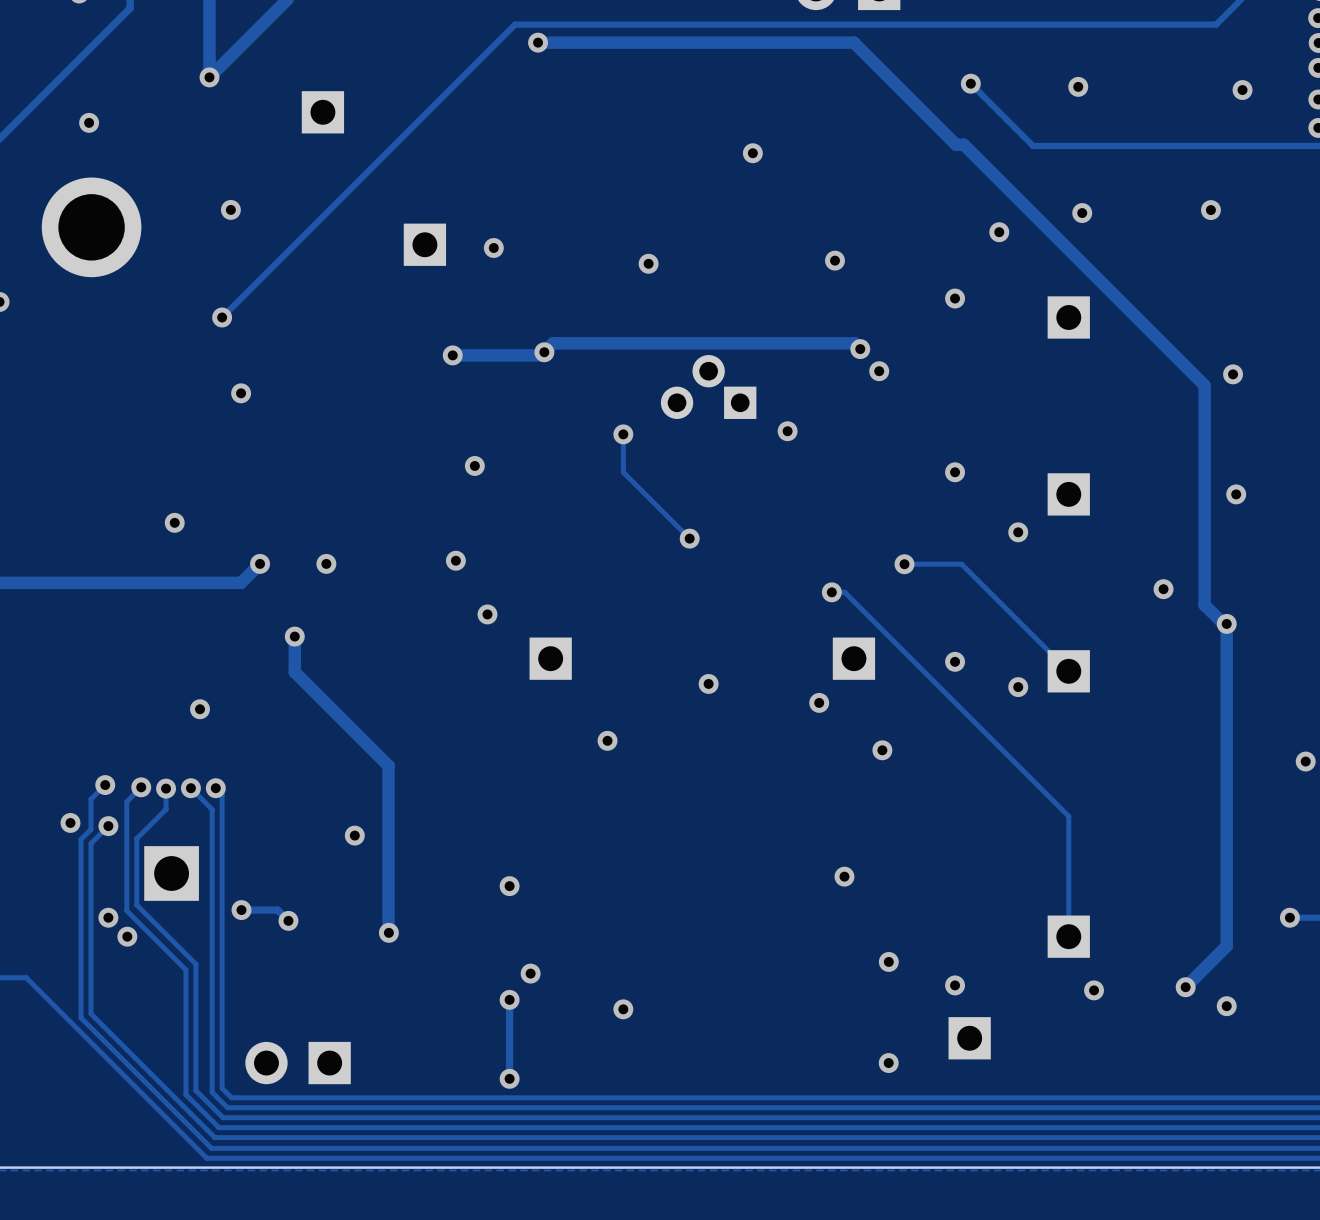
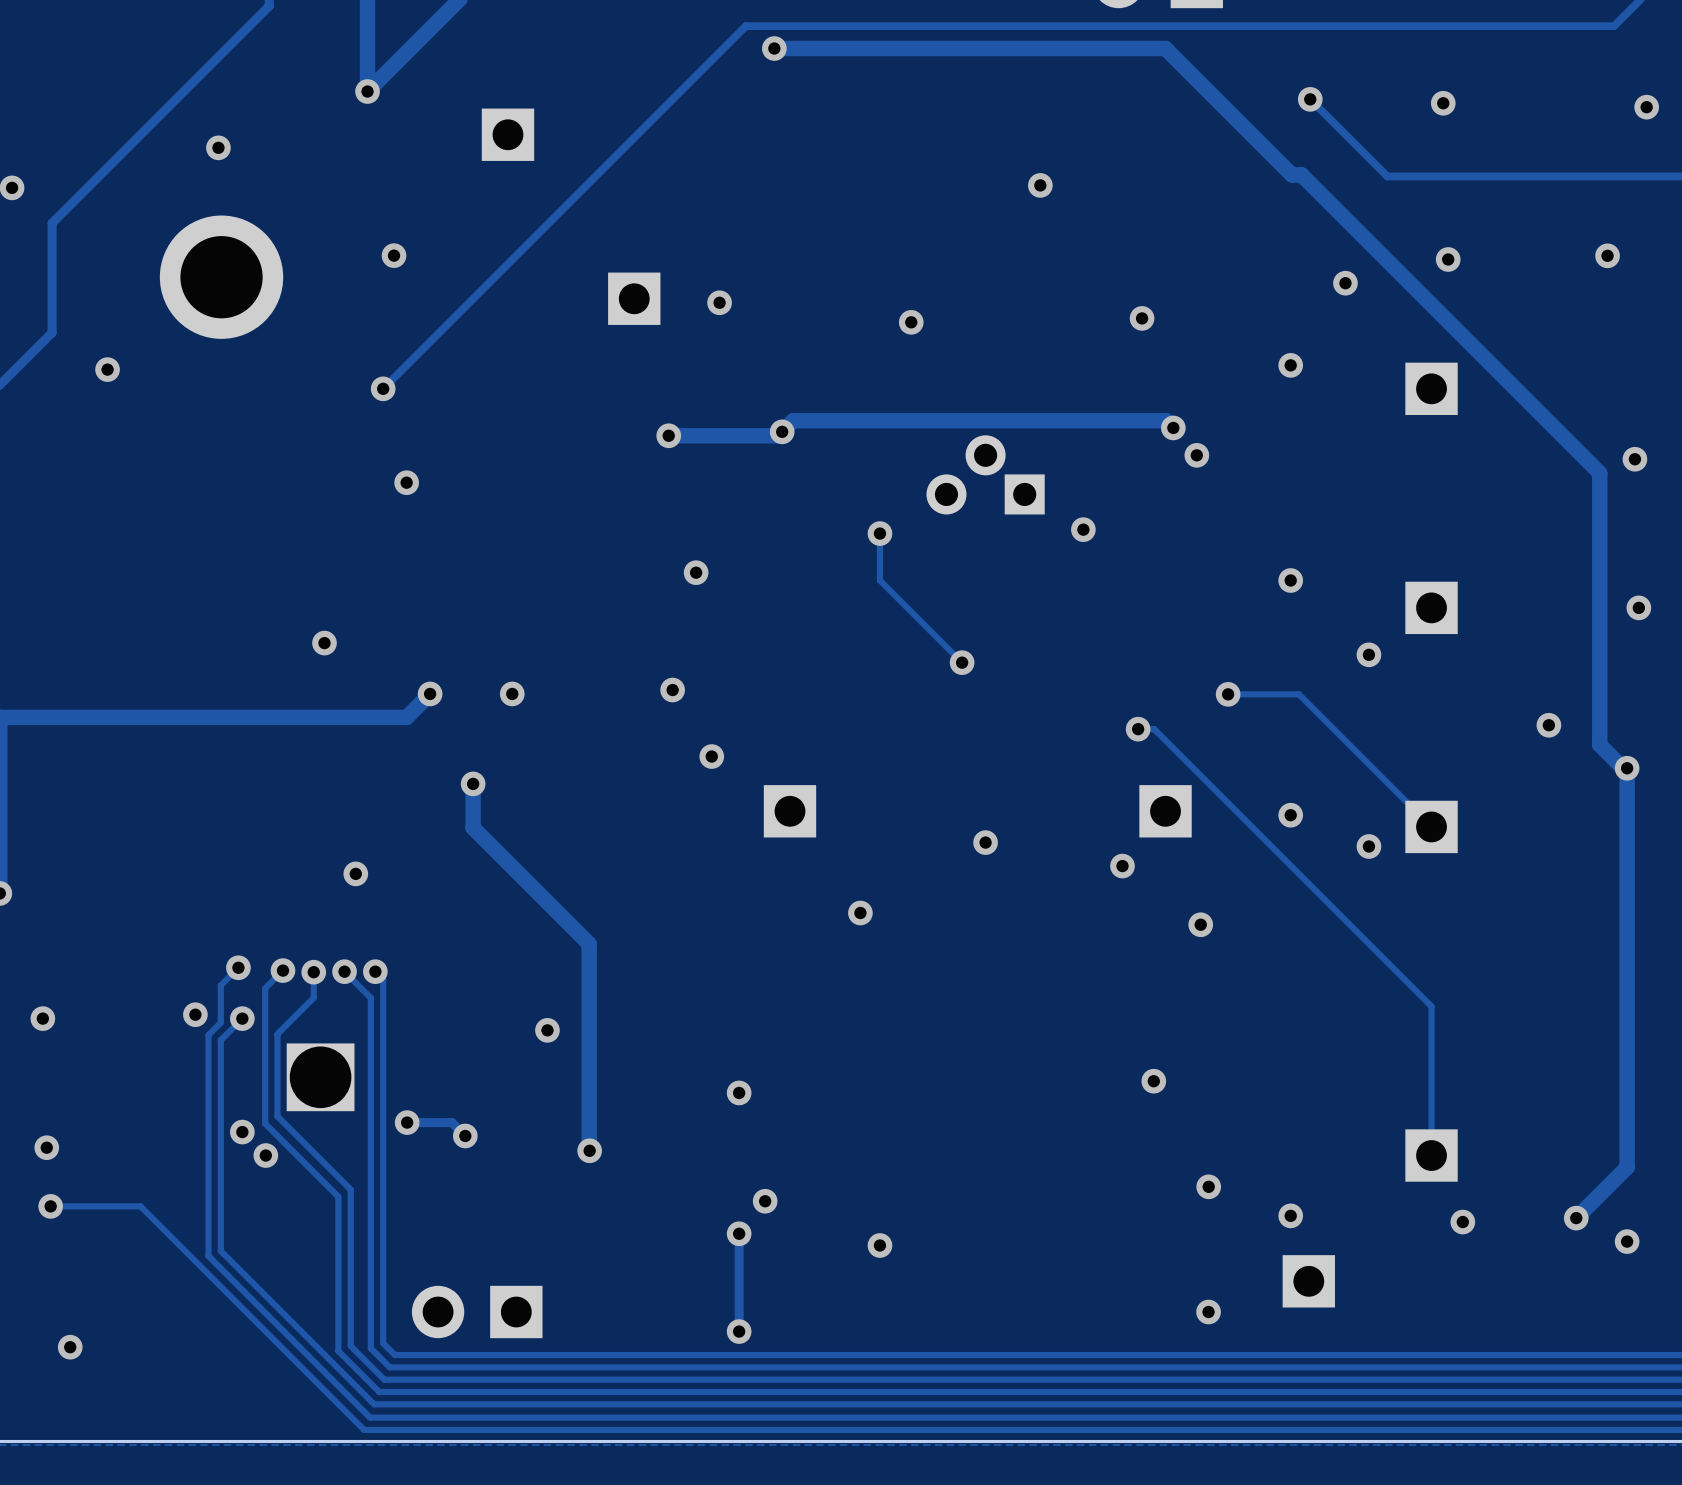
part footprint: [144, 846, 199, 901] -> [286, 1043, 355, 1112]

